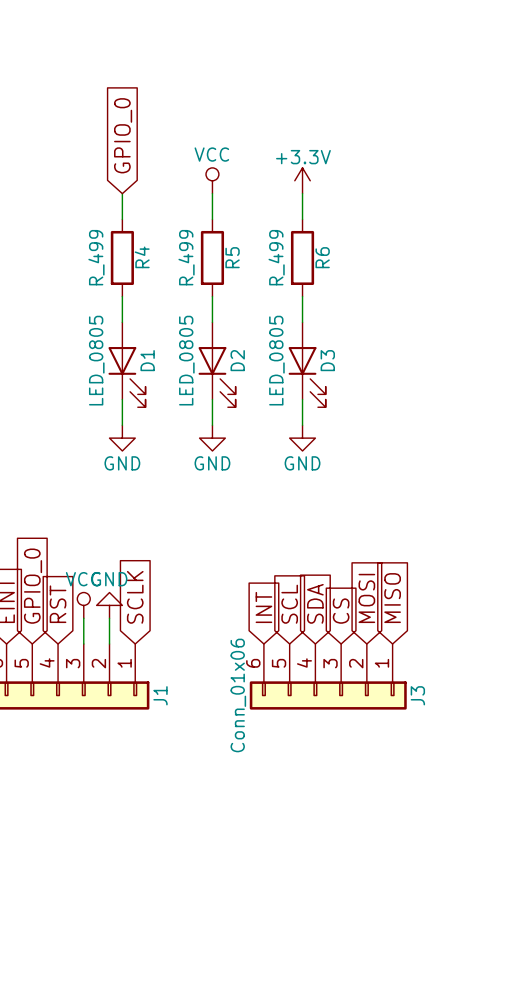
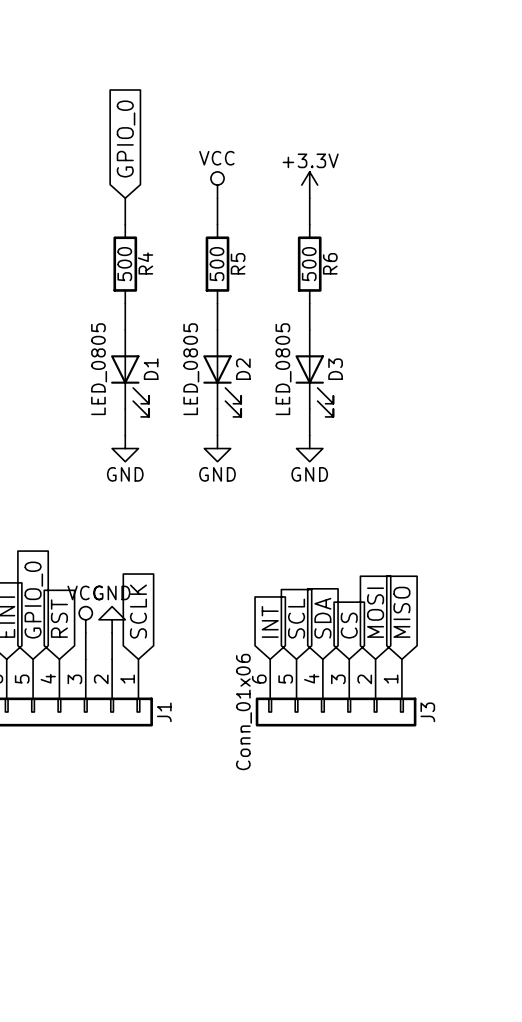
R4 value: R_499 (96, 257) -> 500 (124, 264)
R5 value: R_499 (186, 257) -> 500 (217, 264)
R6 value: R_499 (276, 257) -> 500 (309, 264)

